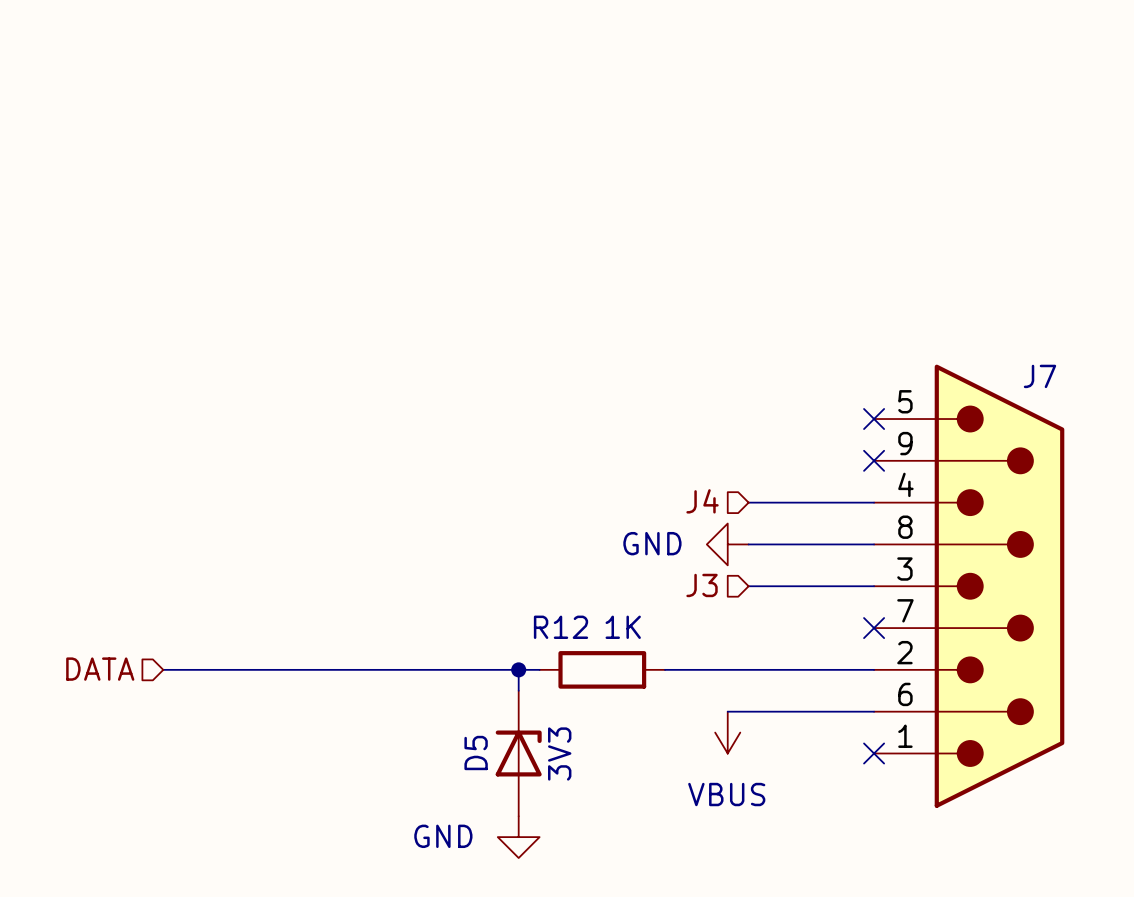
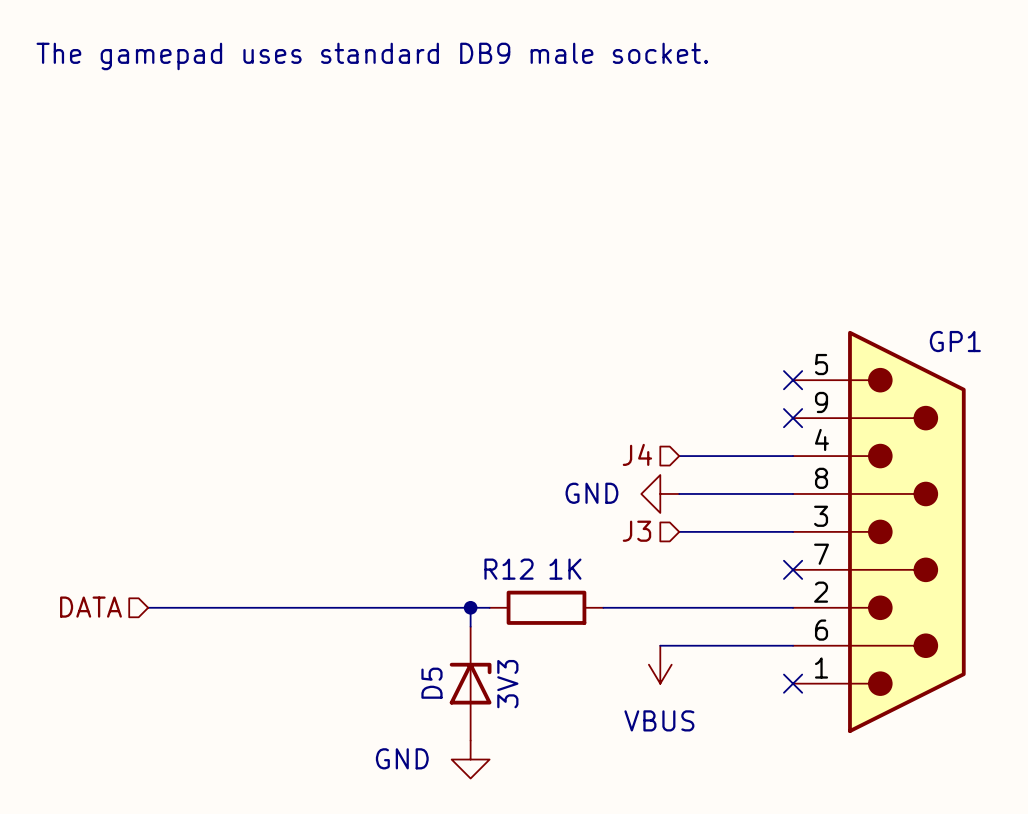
text: none -> The gamepad uses standard DB9 male socket. (372, 56)
J7 name: J7 (1039, 376) -> GP1 (955, 341)

